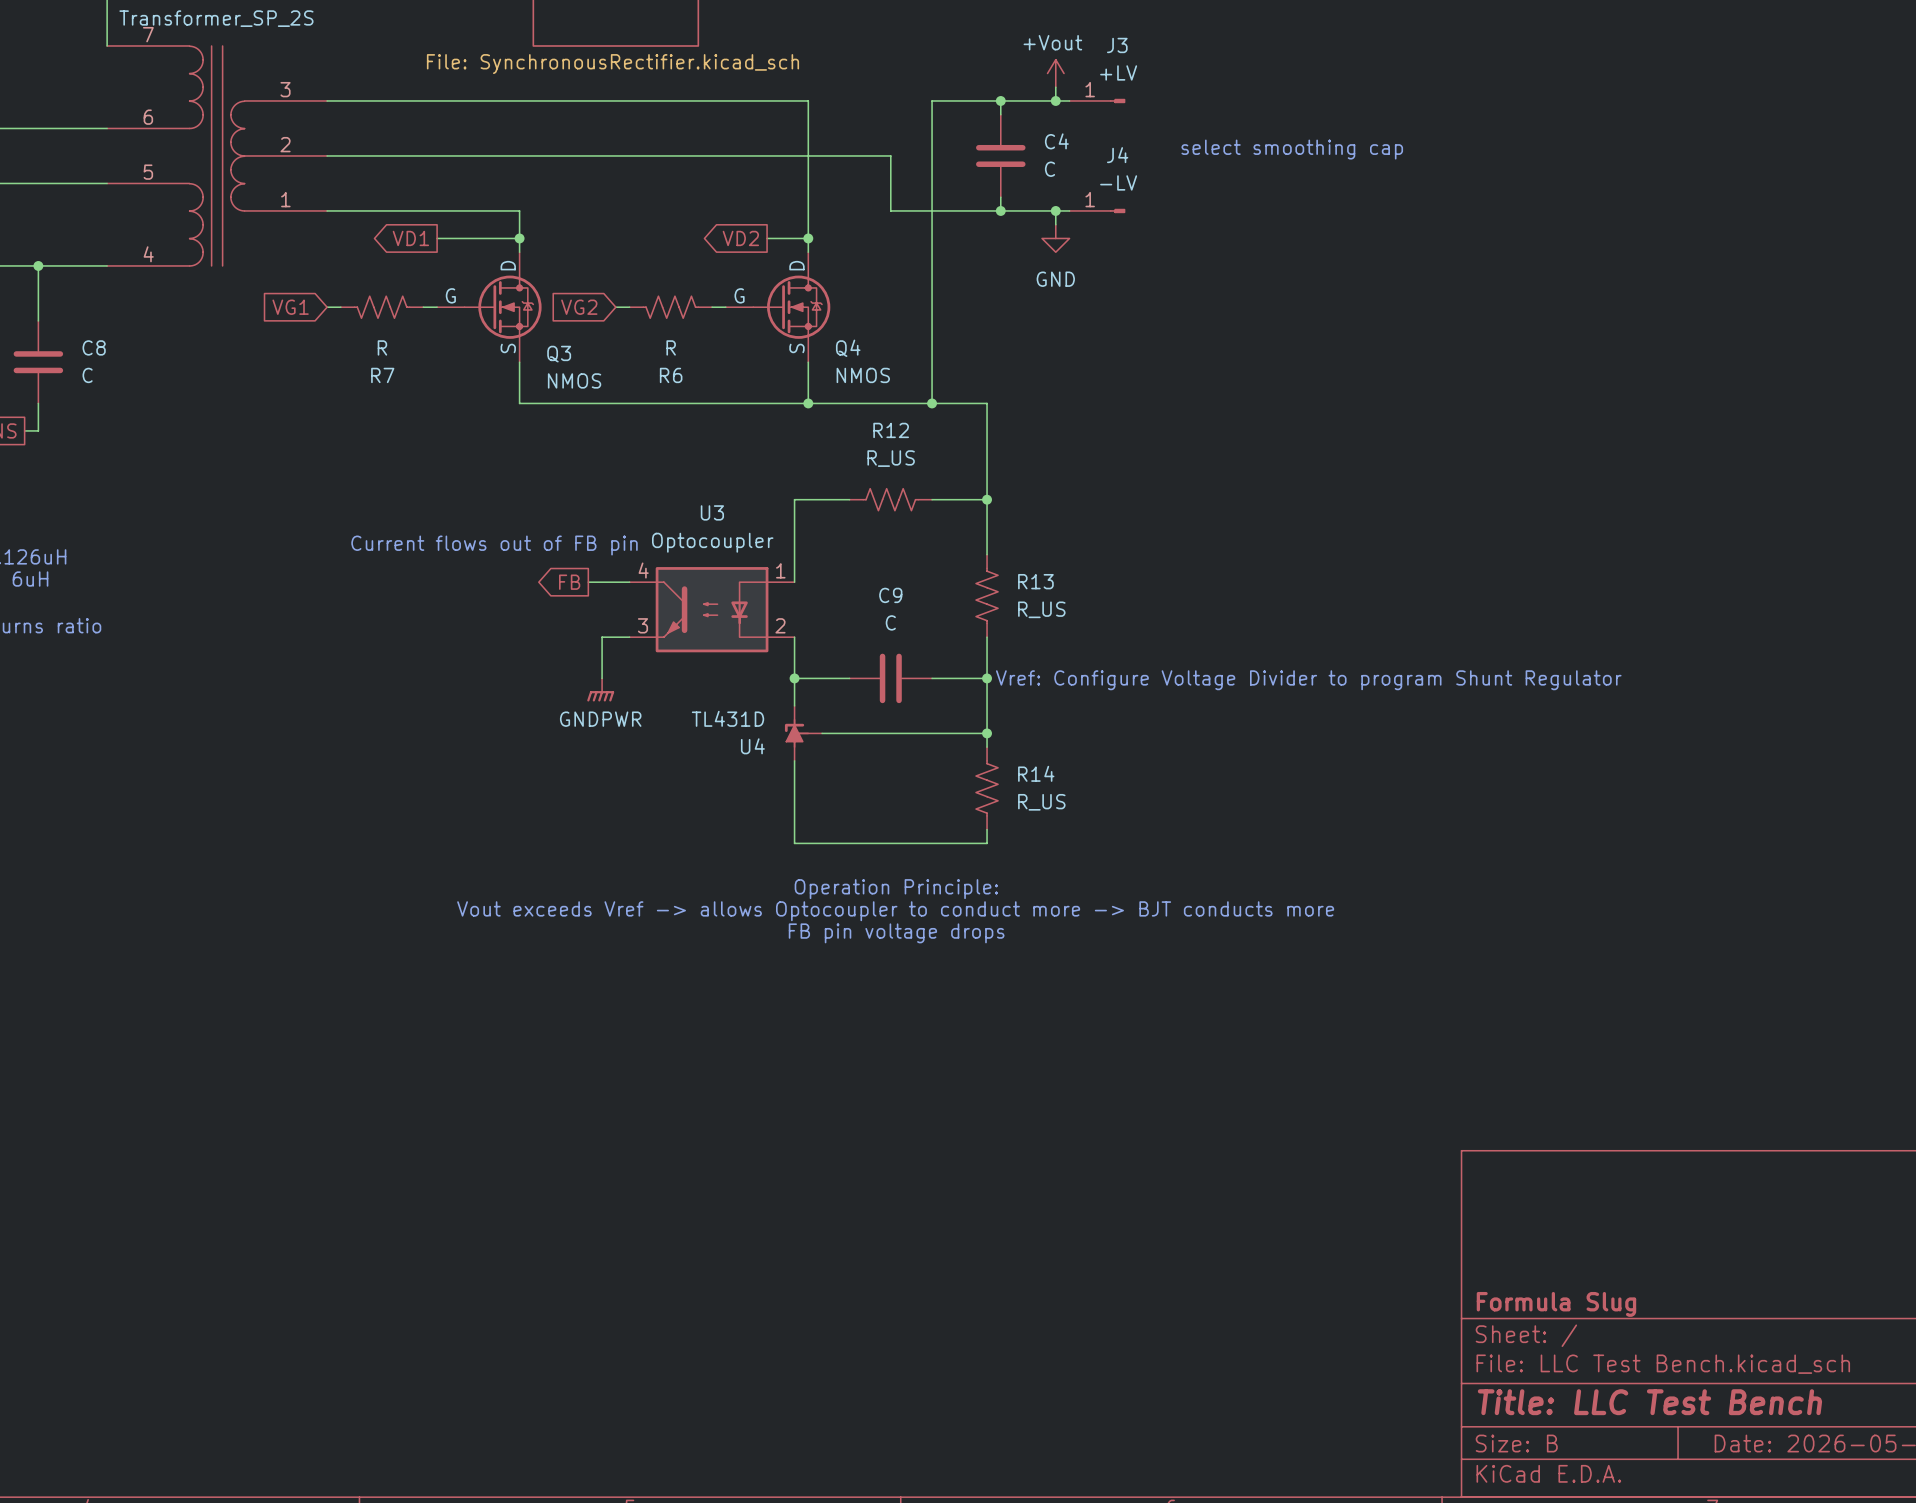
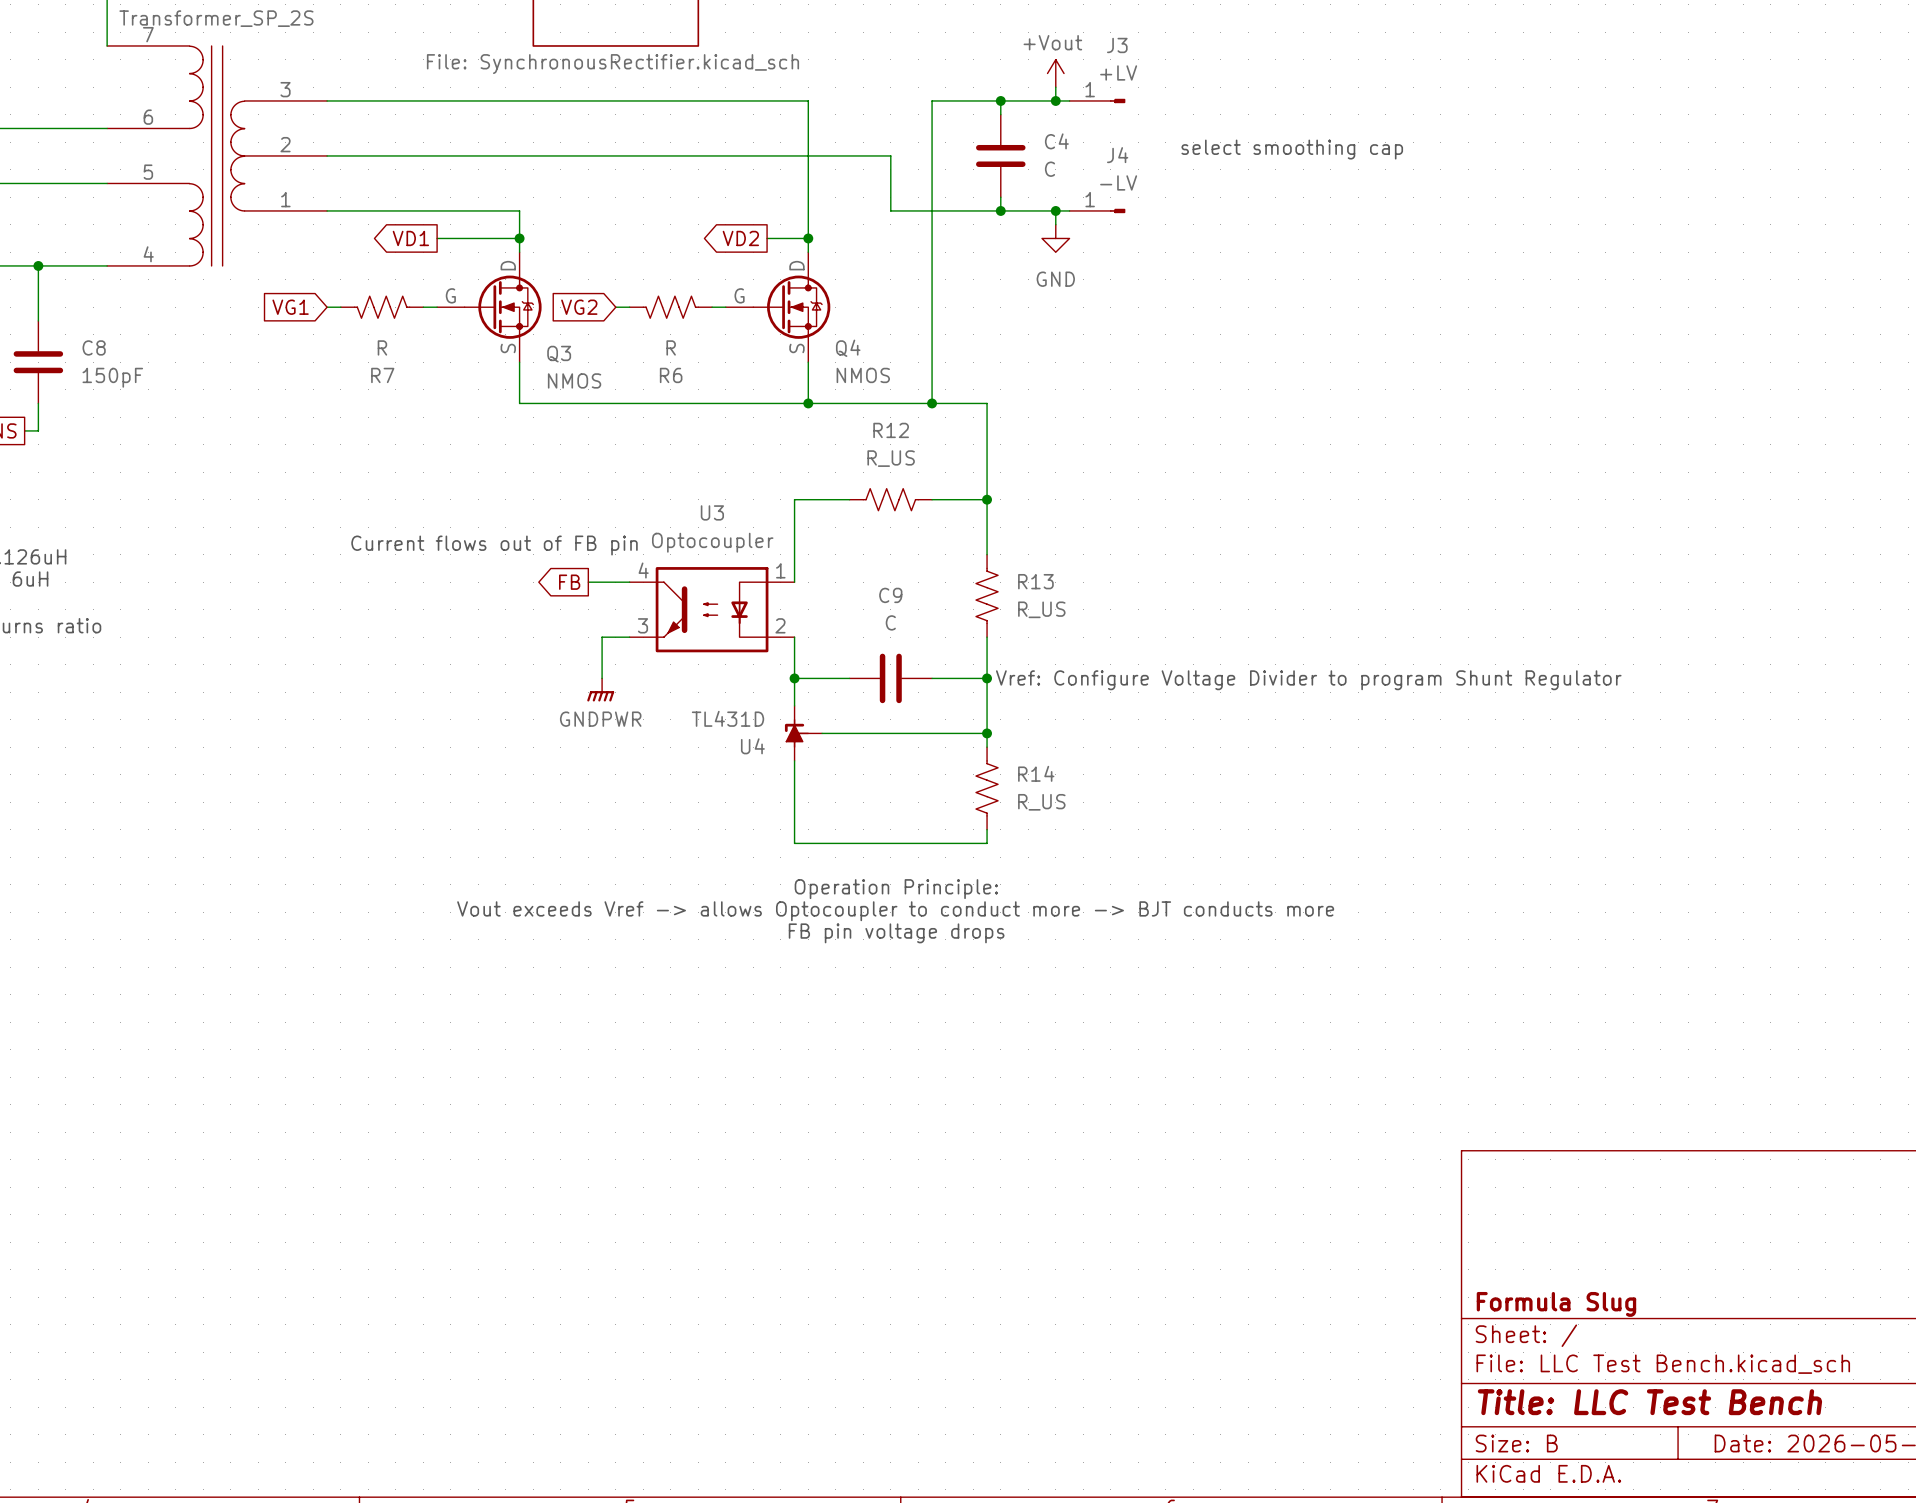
C8 value: C (87, 375) -> 150pF (112, 377)

